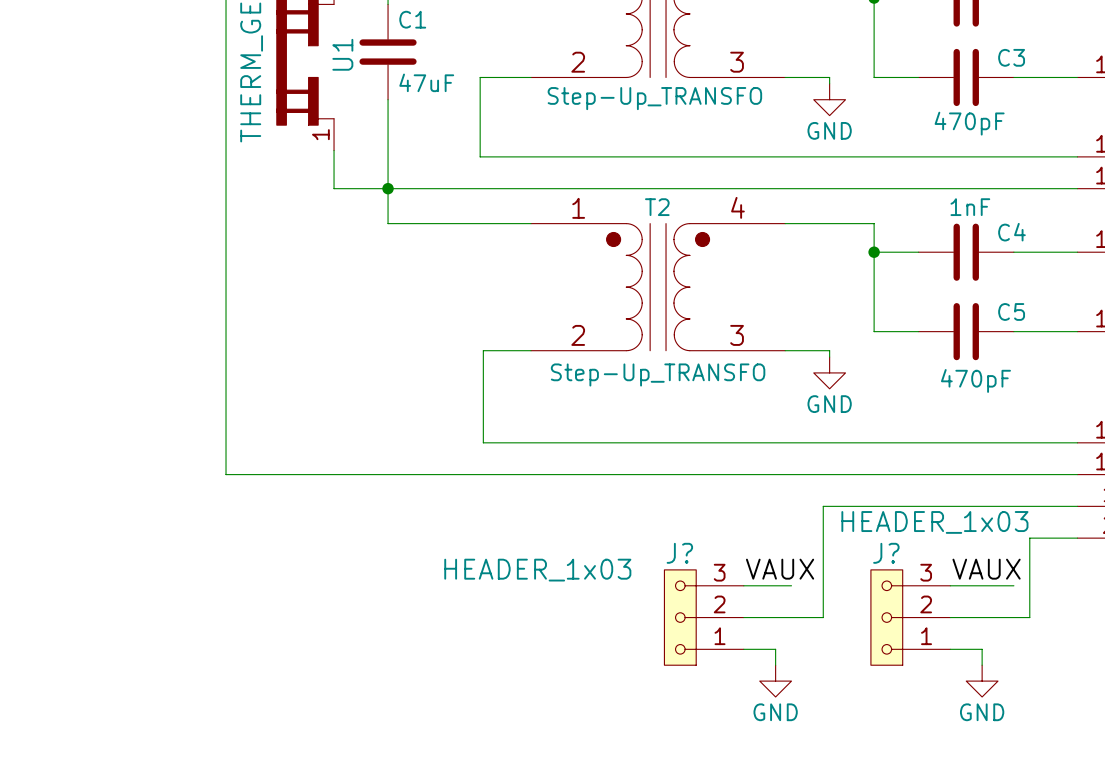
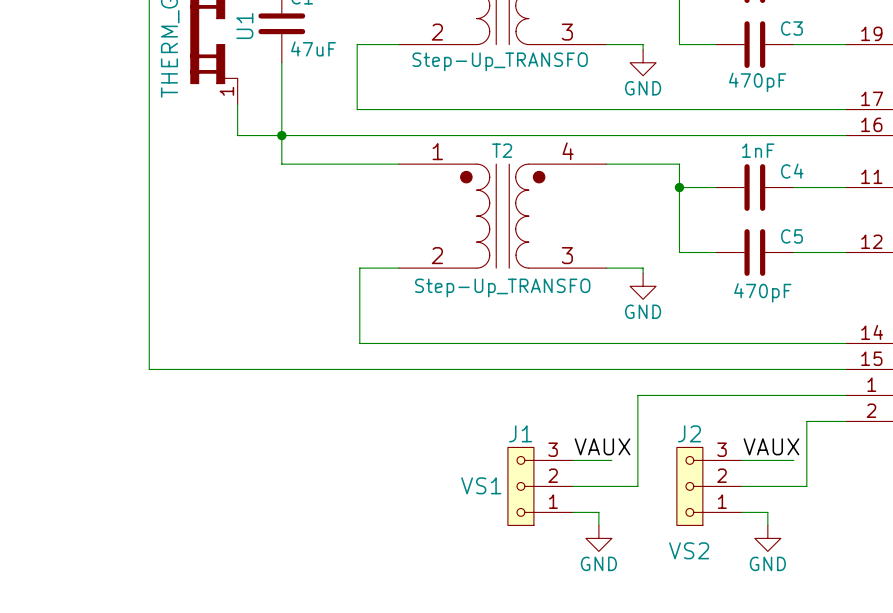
J? value: HEADER_1x03 (934, 522) -> VS2 (689, 550)
J? name: J? (679, 553) -> J1 (520, 433)
J? name: J? (886, 553) -> J2 (689, 433)
J? value: HEADER_1x03 (537, 570) -> VS1 (481, 485)

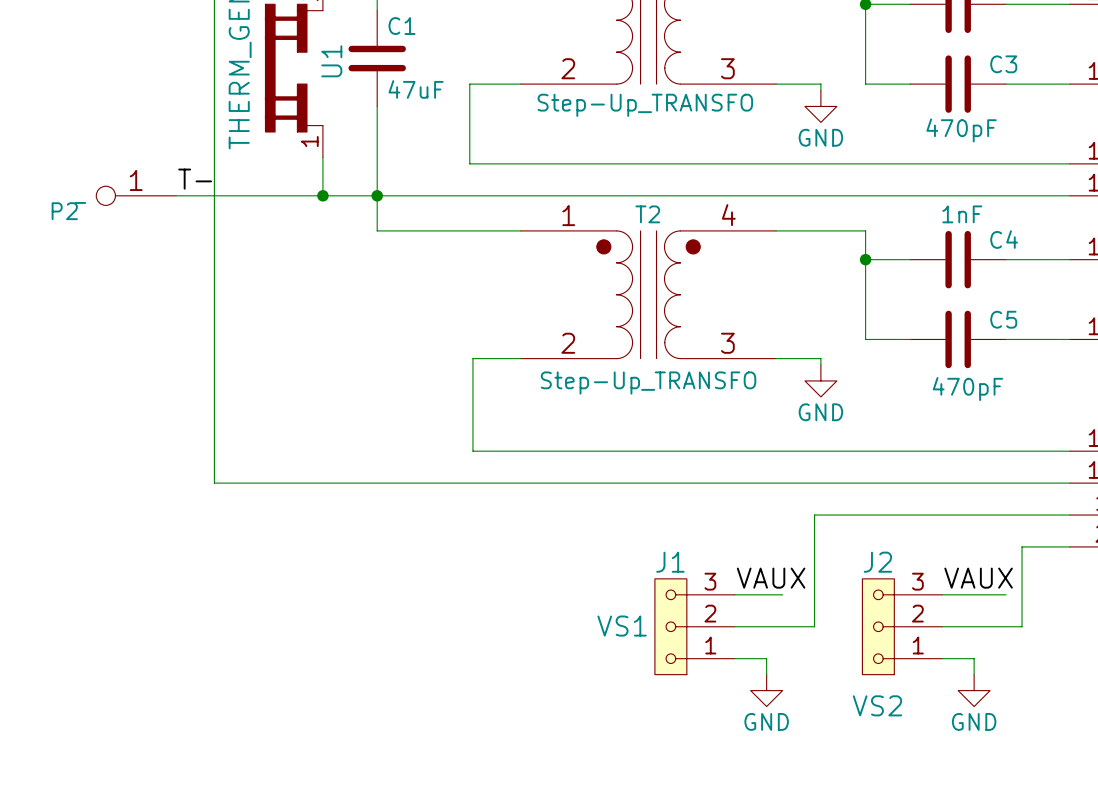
label: none -> T- (195, 179)
P2: none -> _ (136, 195)
wire: none -> (176, 195) (322, 195)
junction: none -> (322, 195)

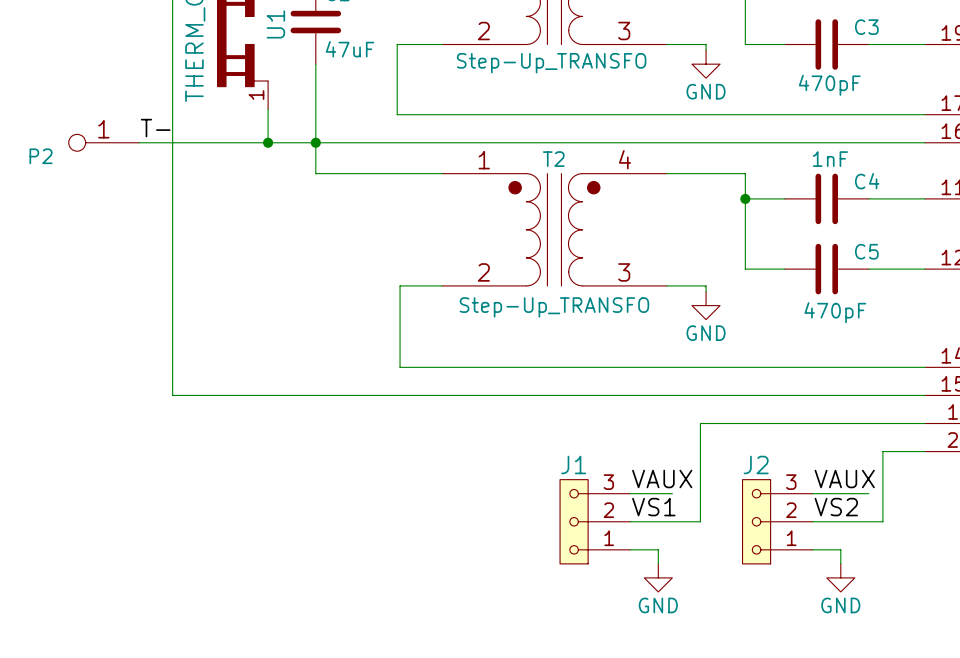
P2 value: _ (80, 202) -> none
label: none -> VS1 (653, 507)
label: none -> VS2 (836, 507)
J1 value: VS1 (622, 626) -> none
J2 value: VS2 (877, 705) -> none

